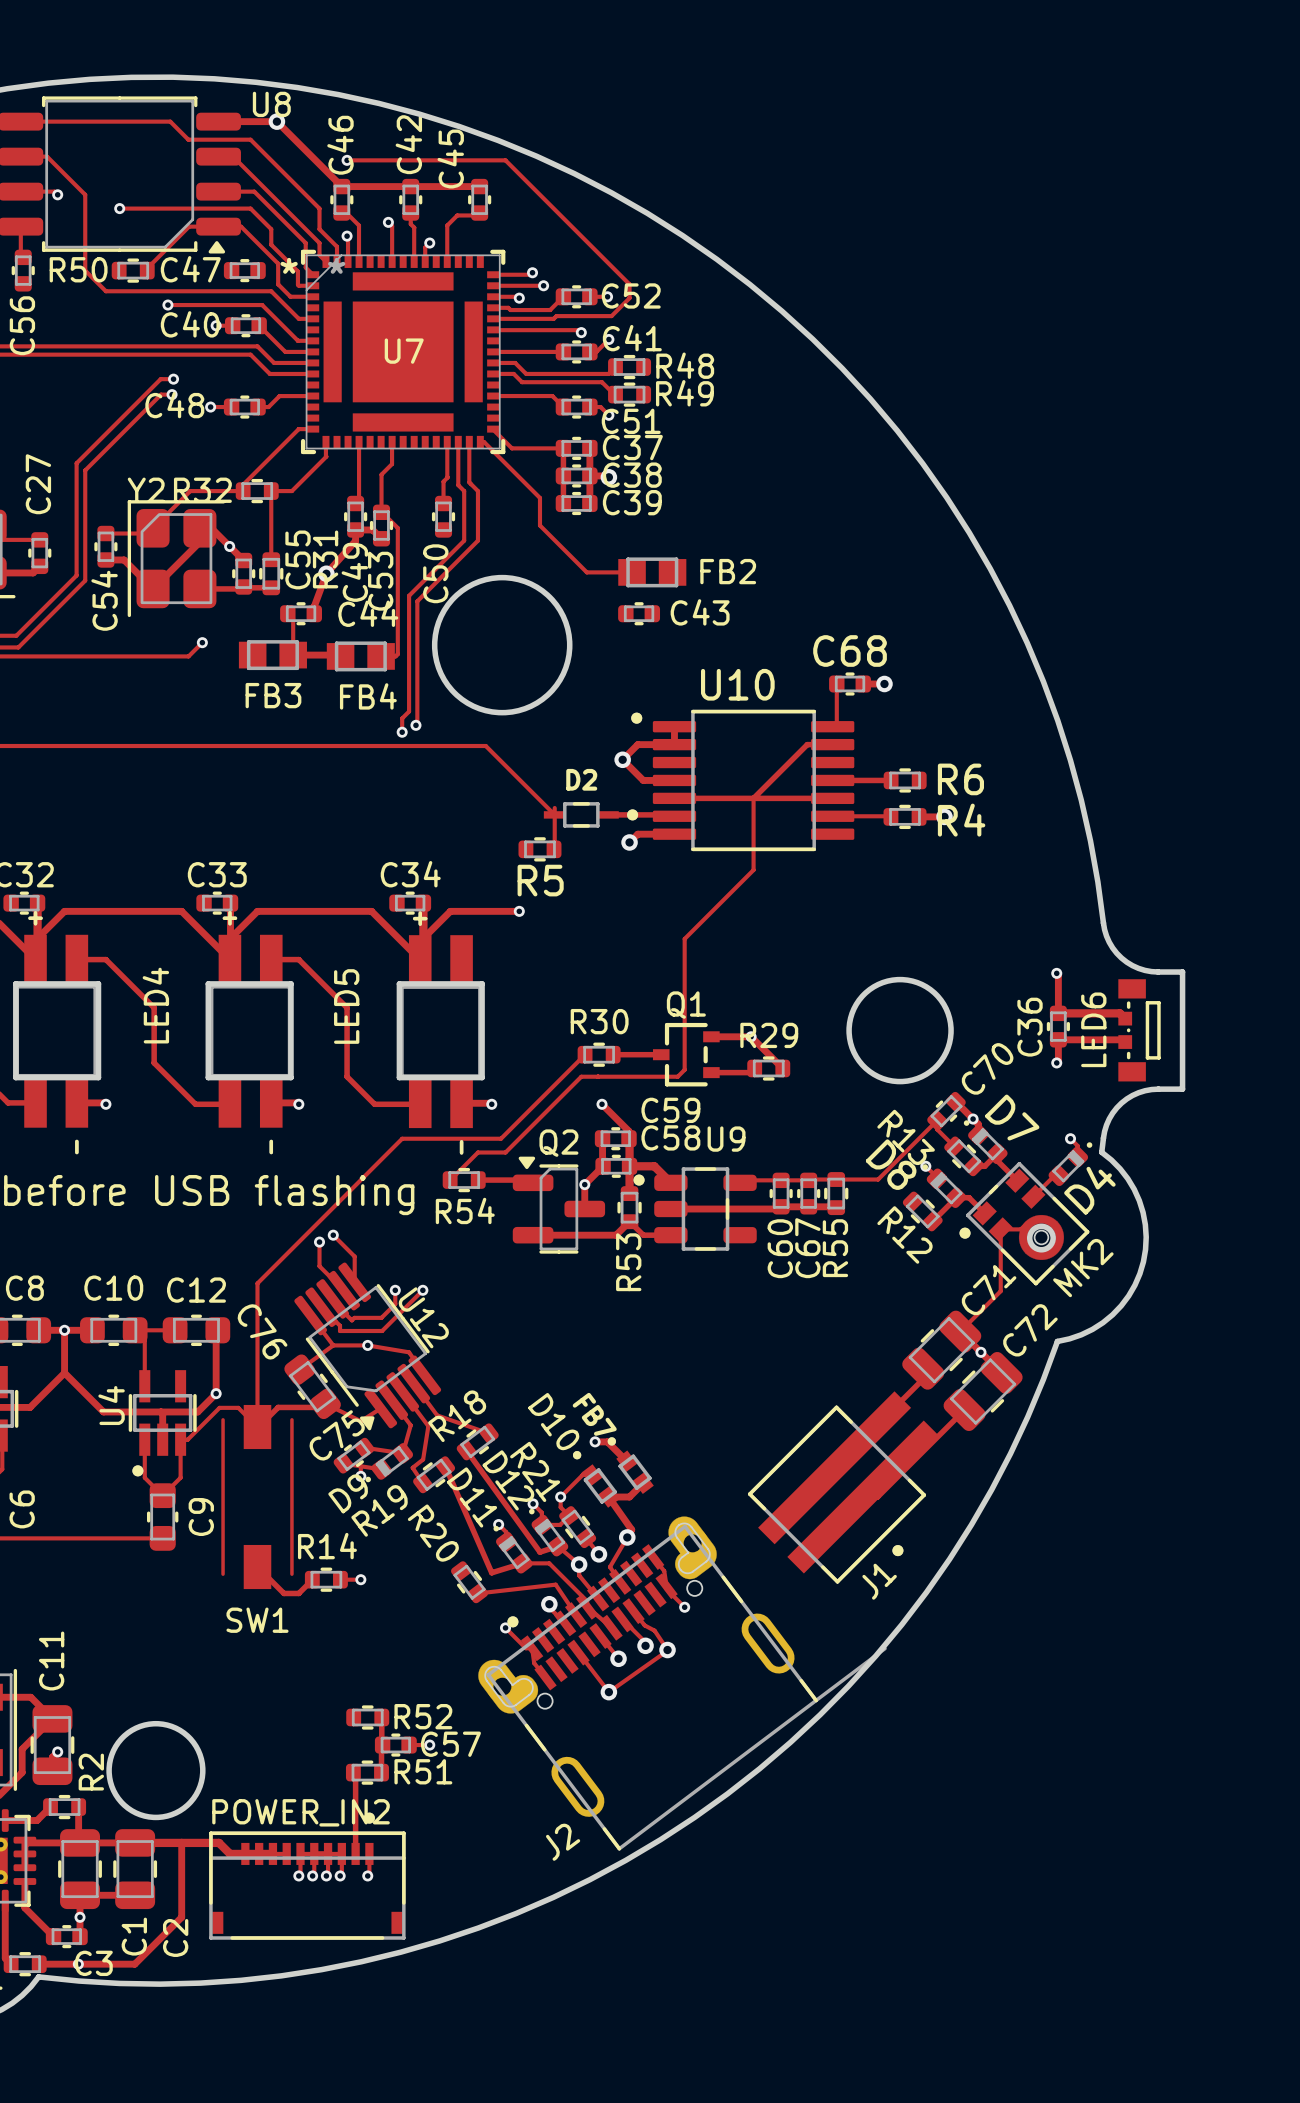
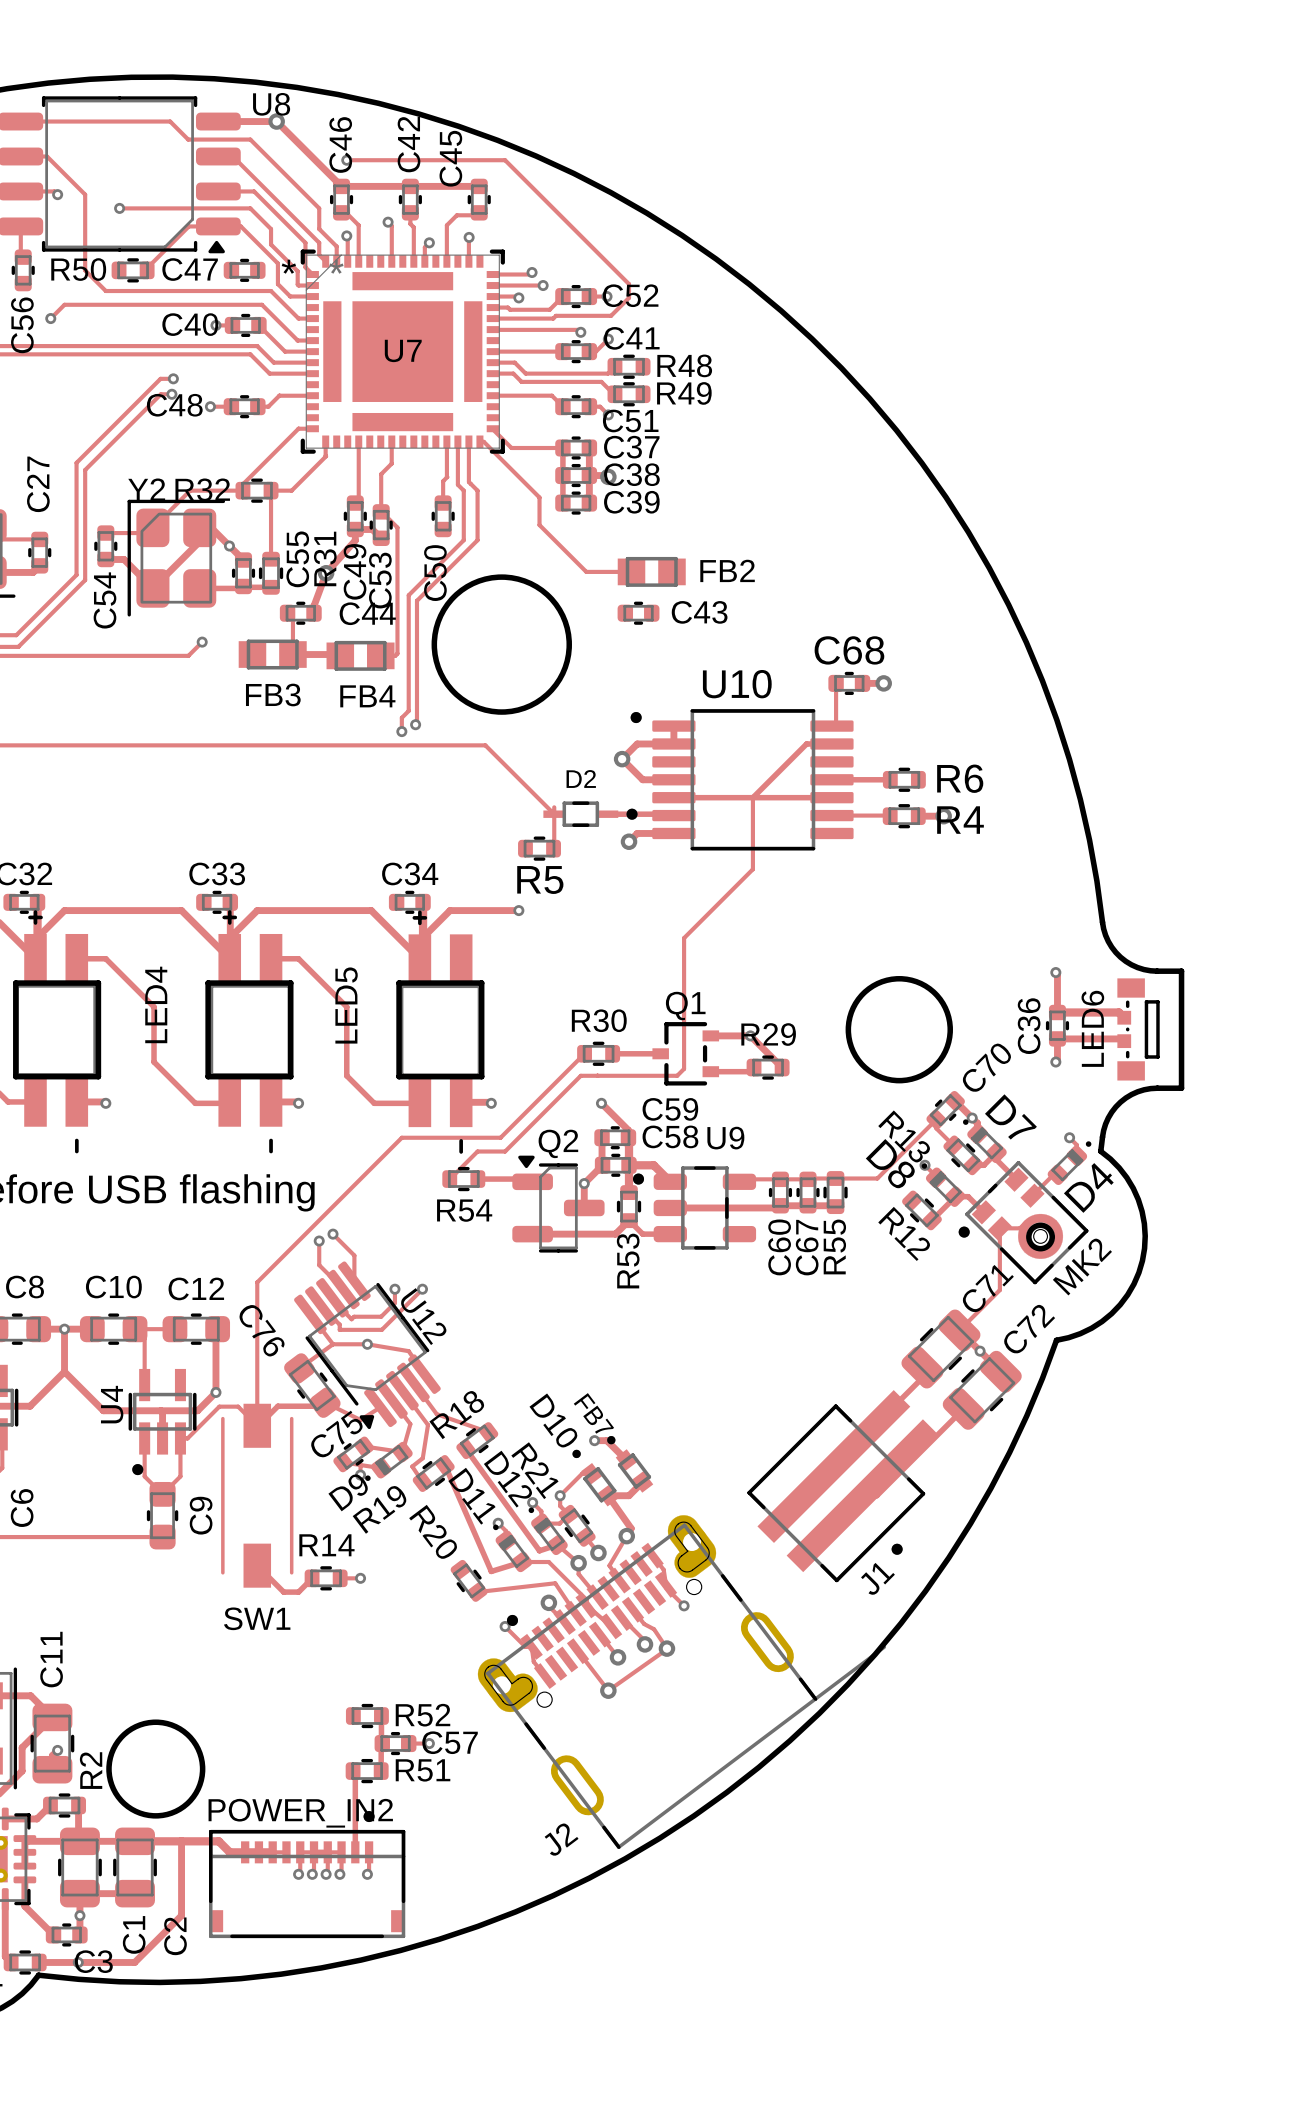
track: none -> (468, 237) (468, 261)
via: none -> (469, 237)
track: none -> (167, 304) (64, 304) (50, 318)
via position: (167, 305) -> (50, 318)

